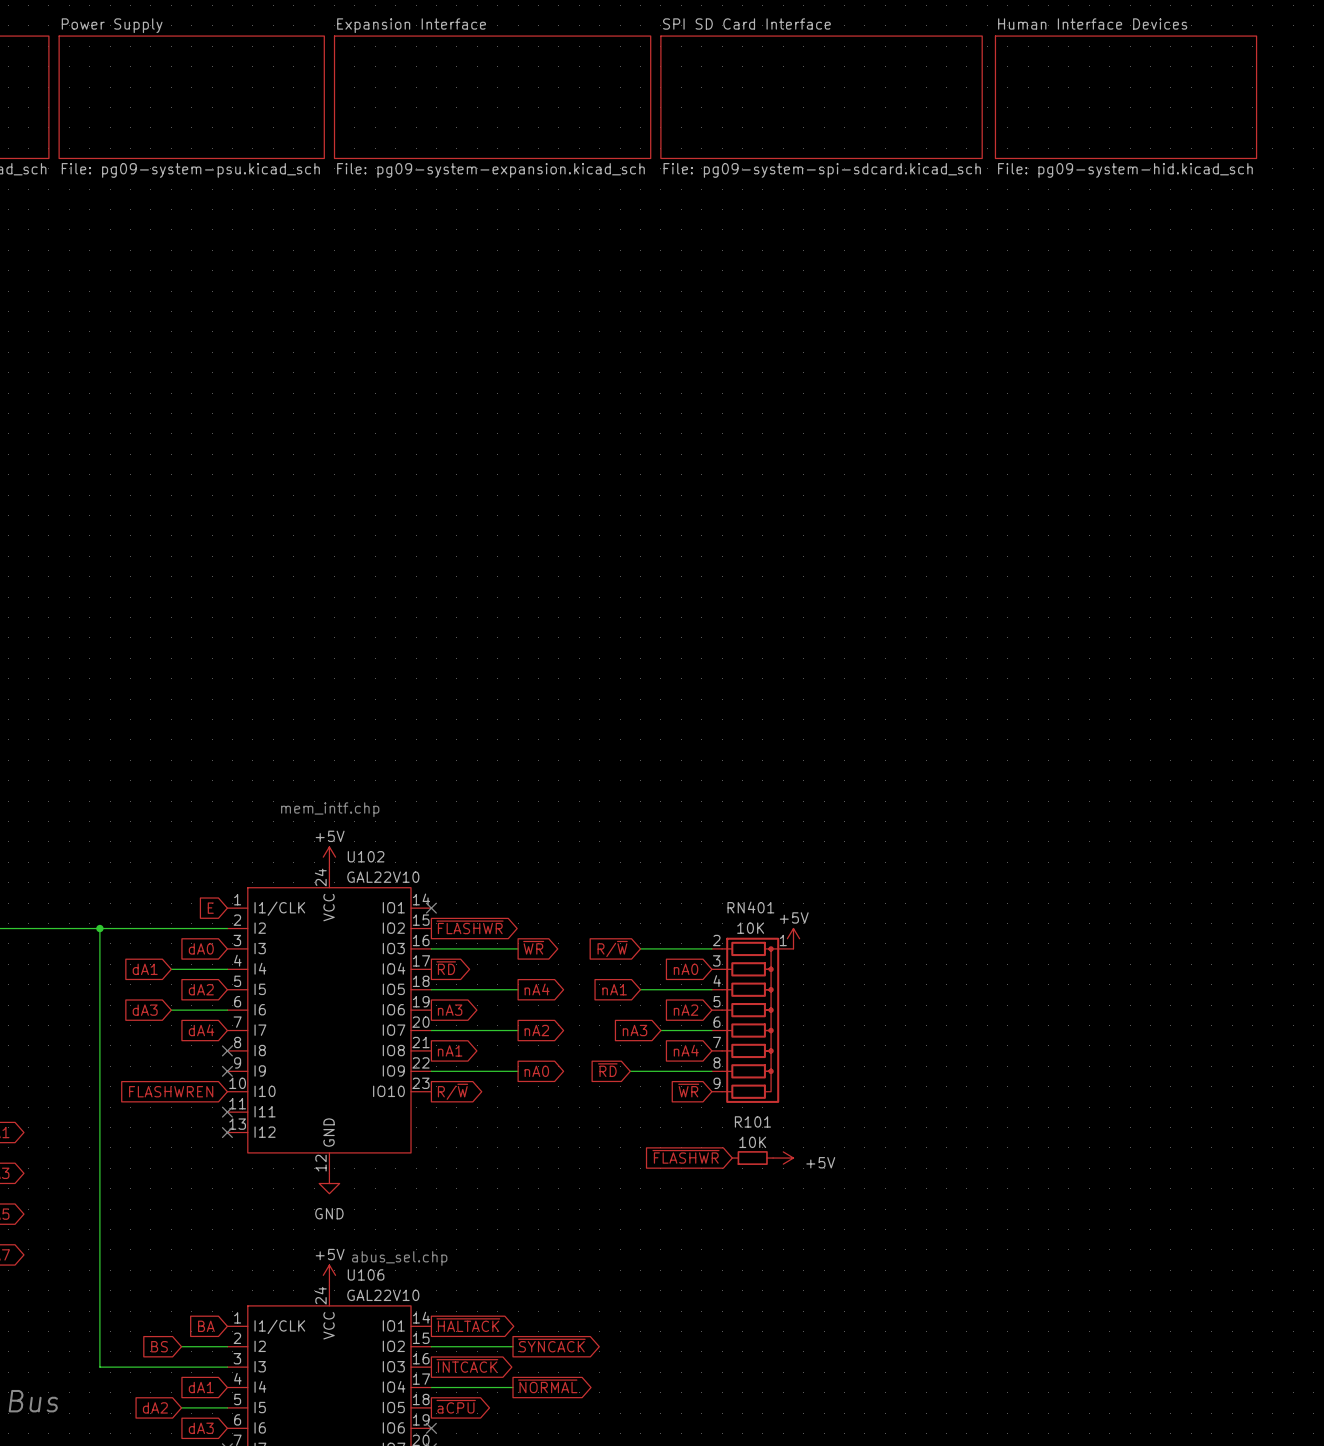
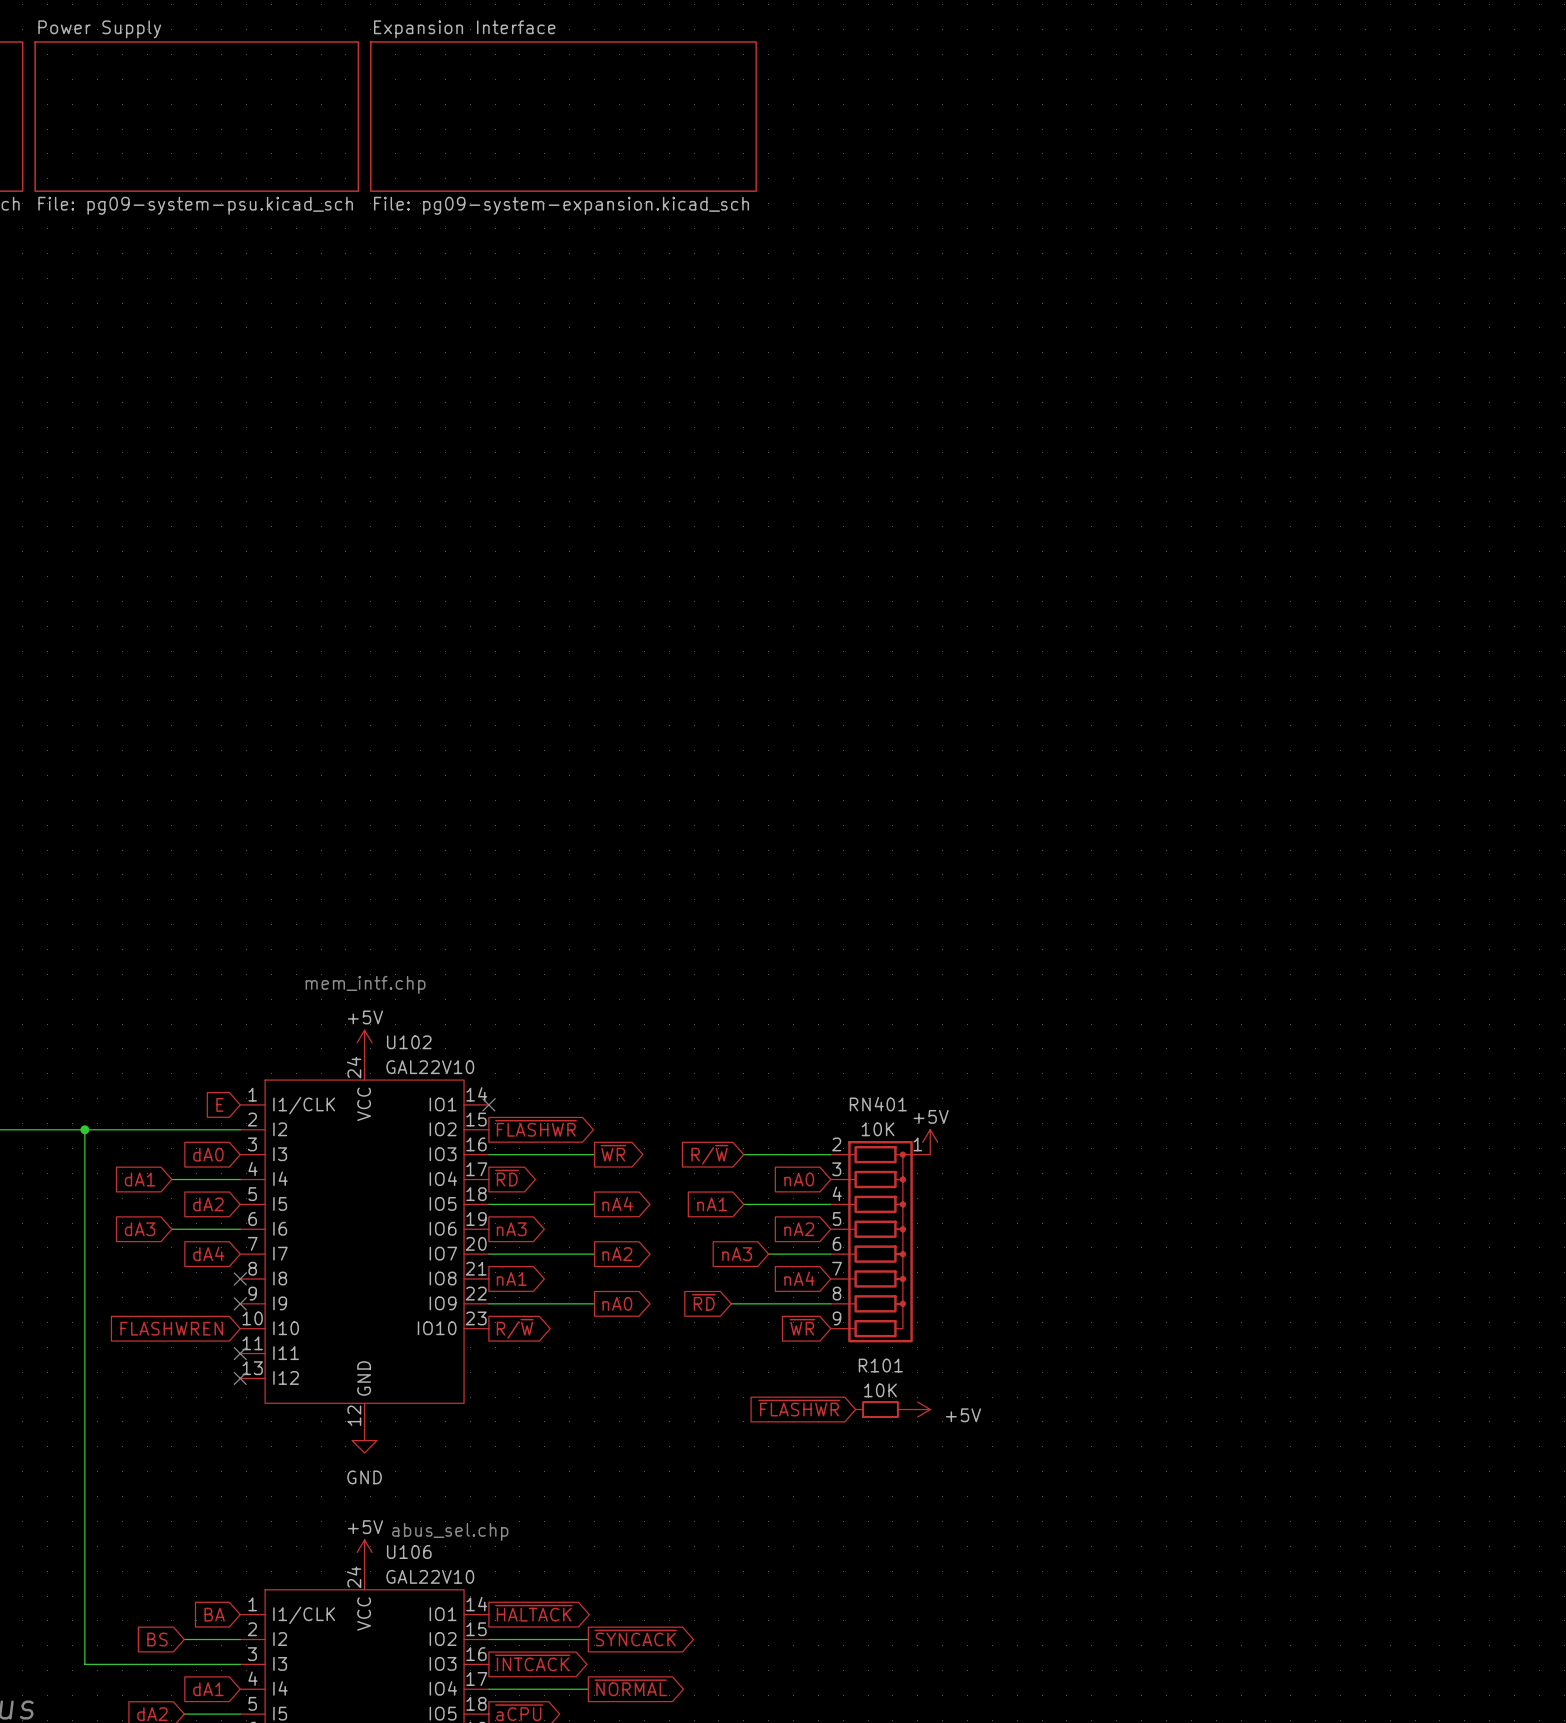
sheet SPI SD Card Interface: File: pg09-system-spi-sdcard.kicad_sch (821, 97) -> none
sheet Human Interface Devices: File: pg09-system-hid.kicad_sch (1126, 97) -> none

